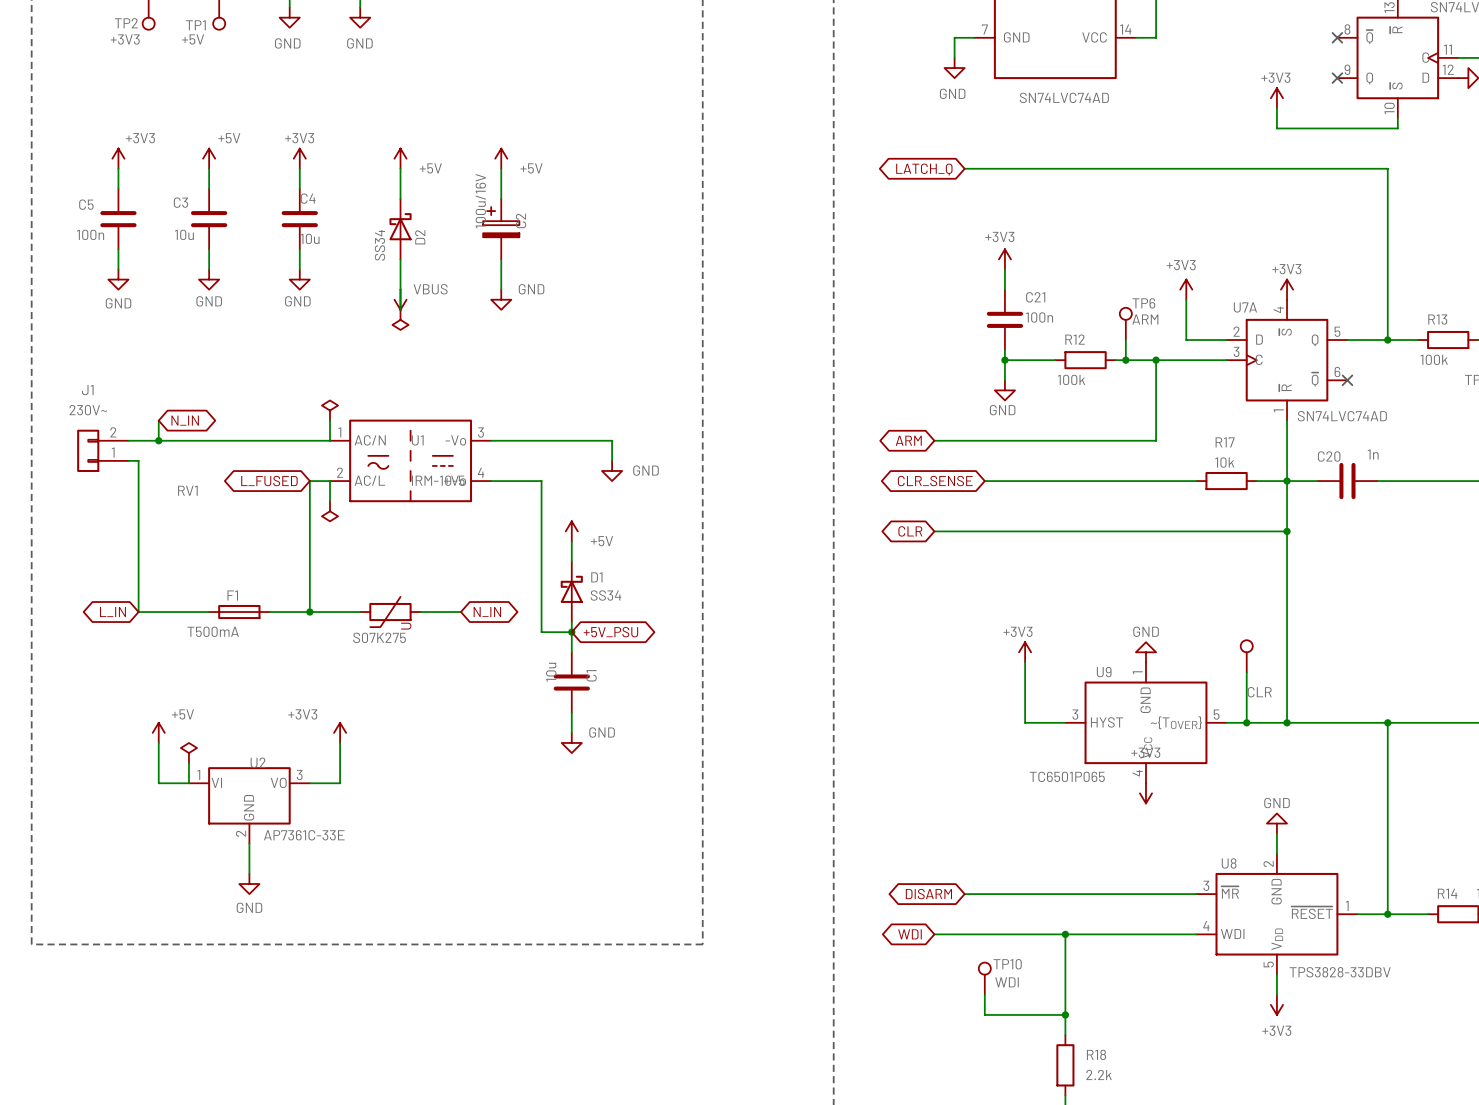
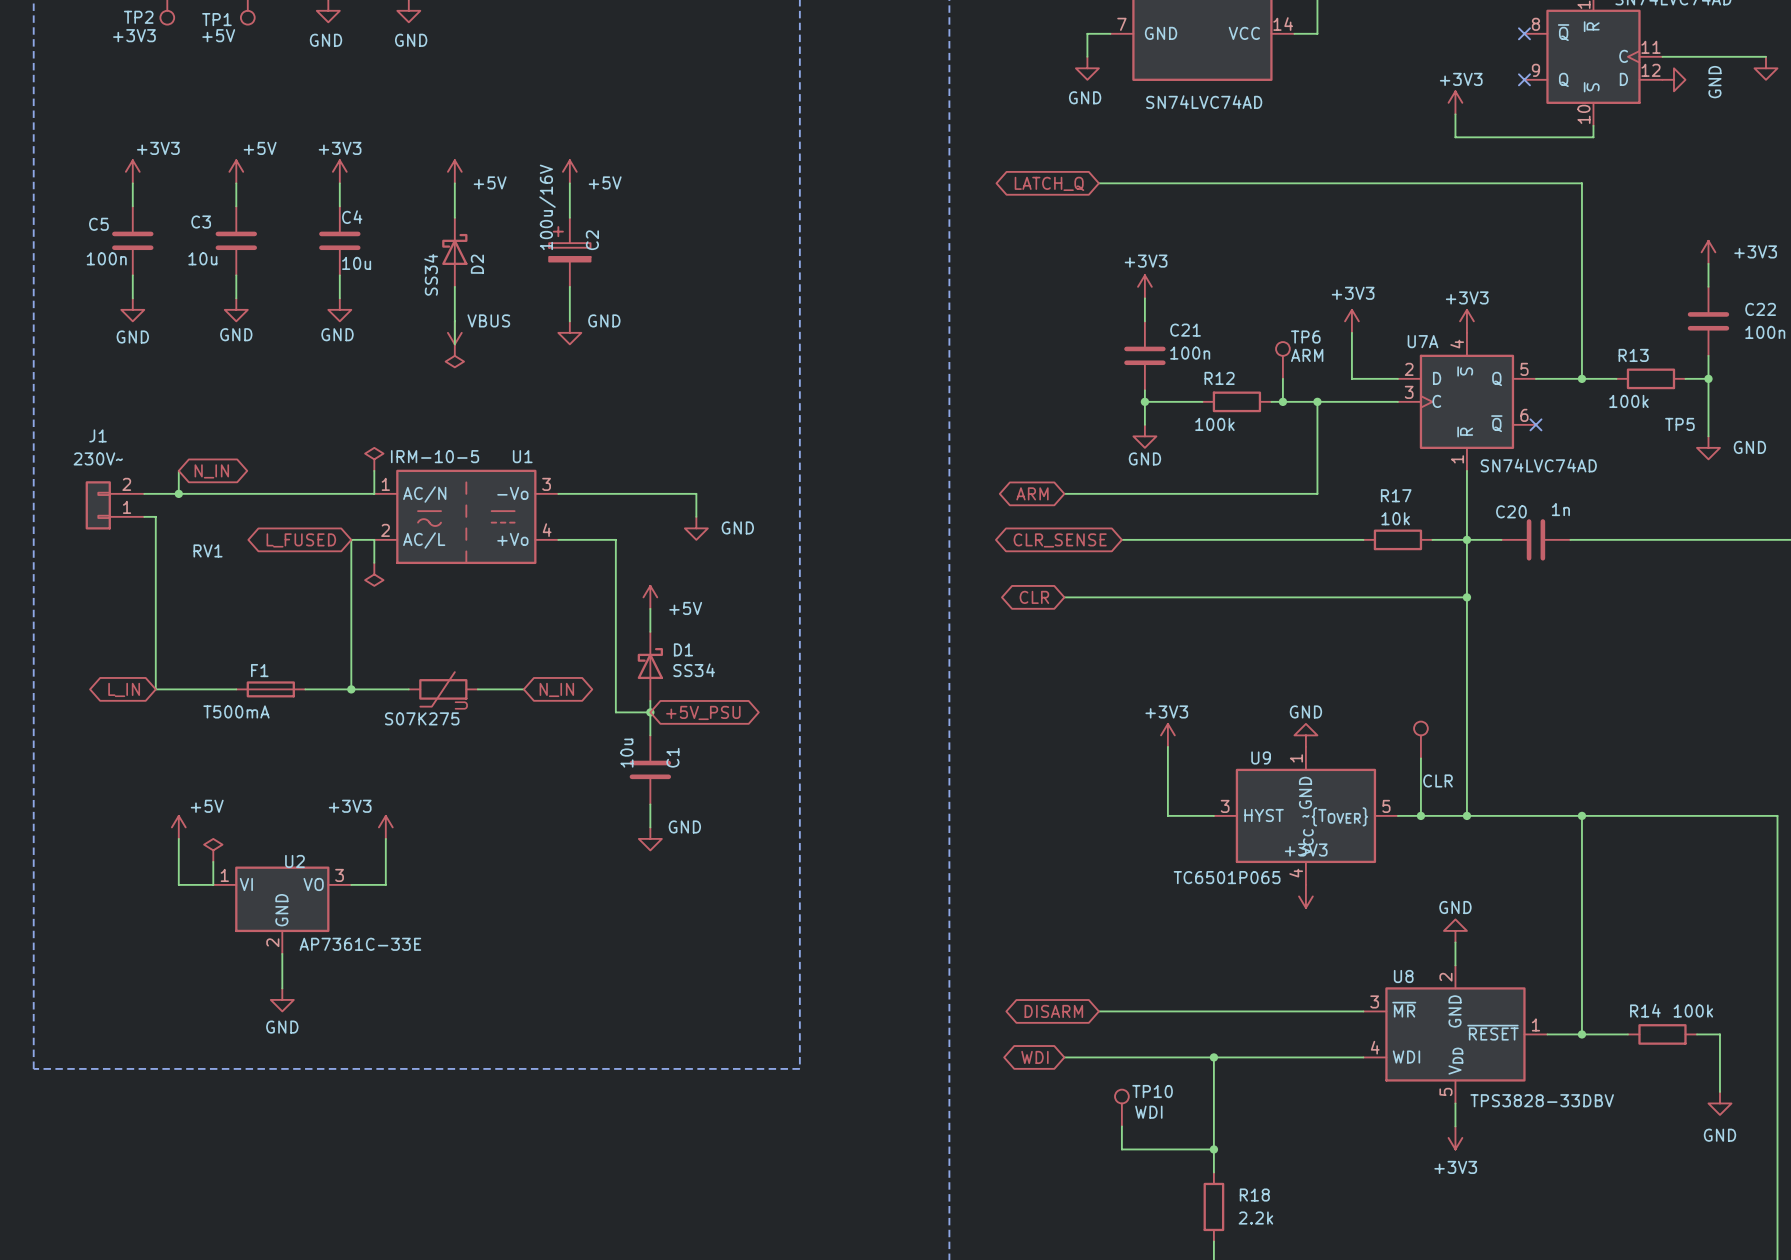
U1 name position: U1 (417, 440) -> U1 (522, 456)
U1 value position: IRM-10-5 (438, 480) -> IRM-10-5 (435, 456)

